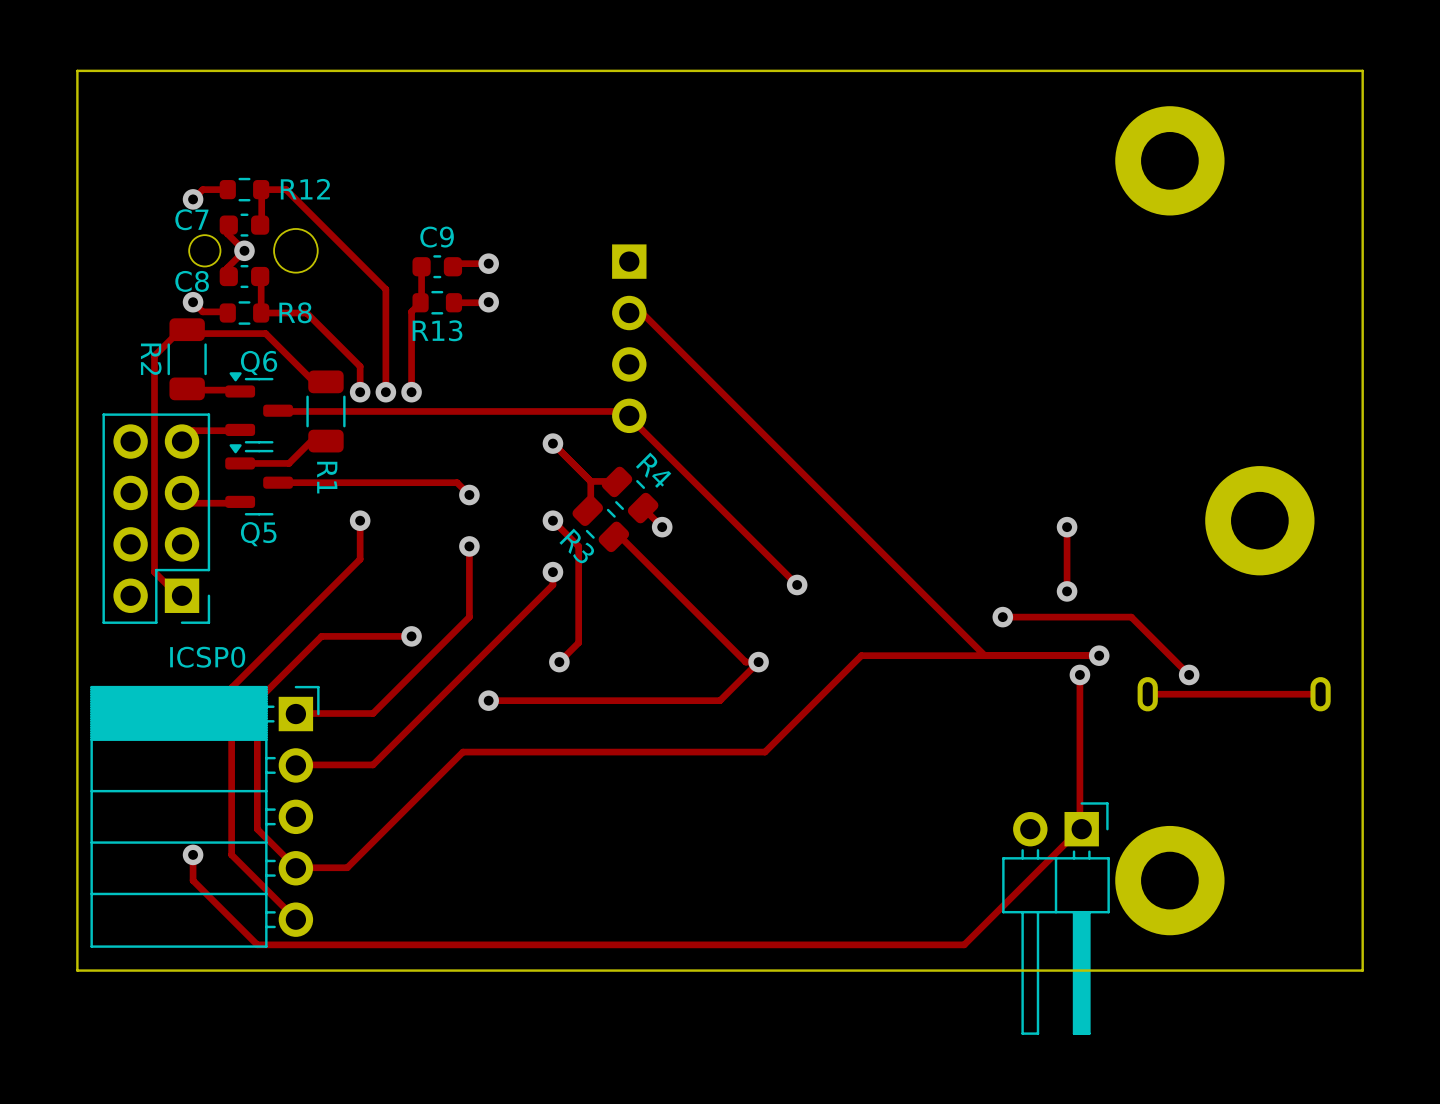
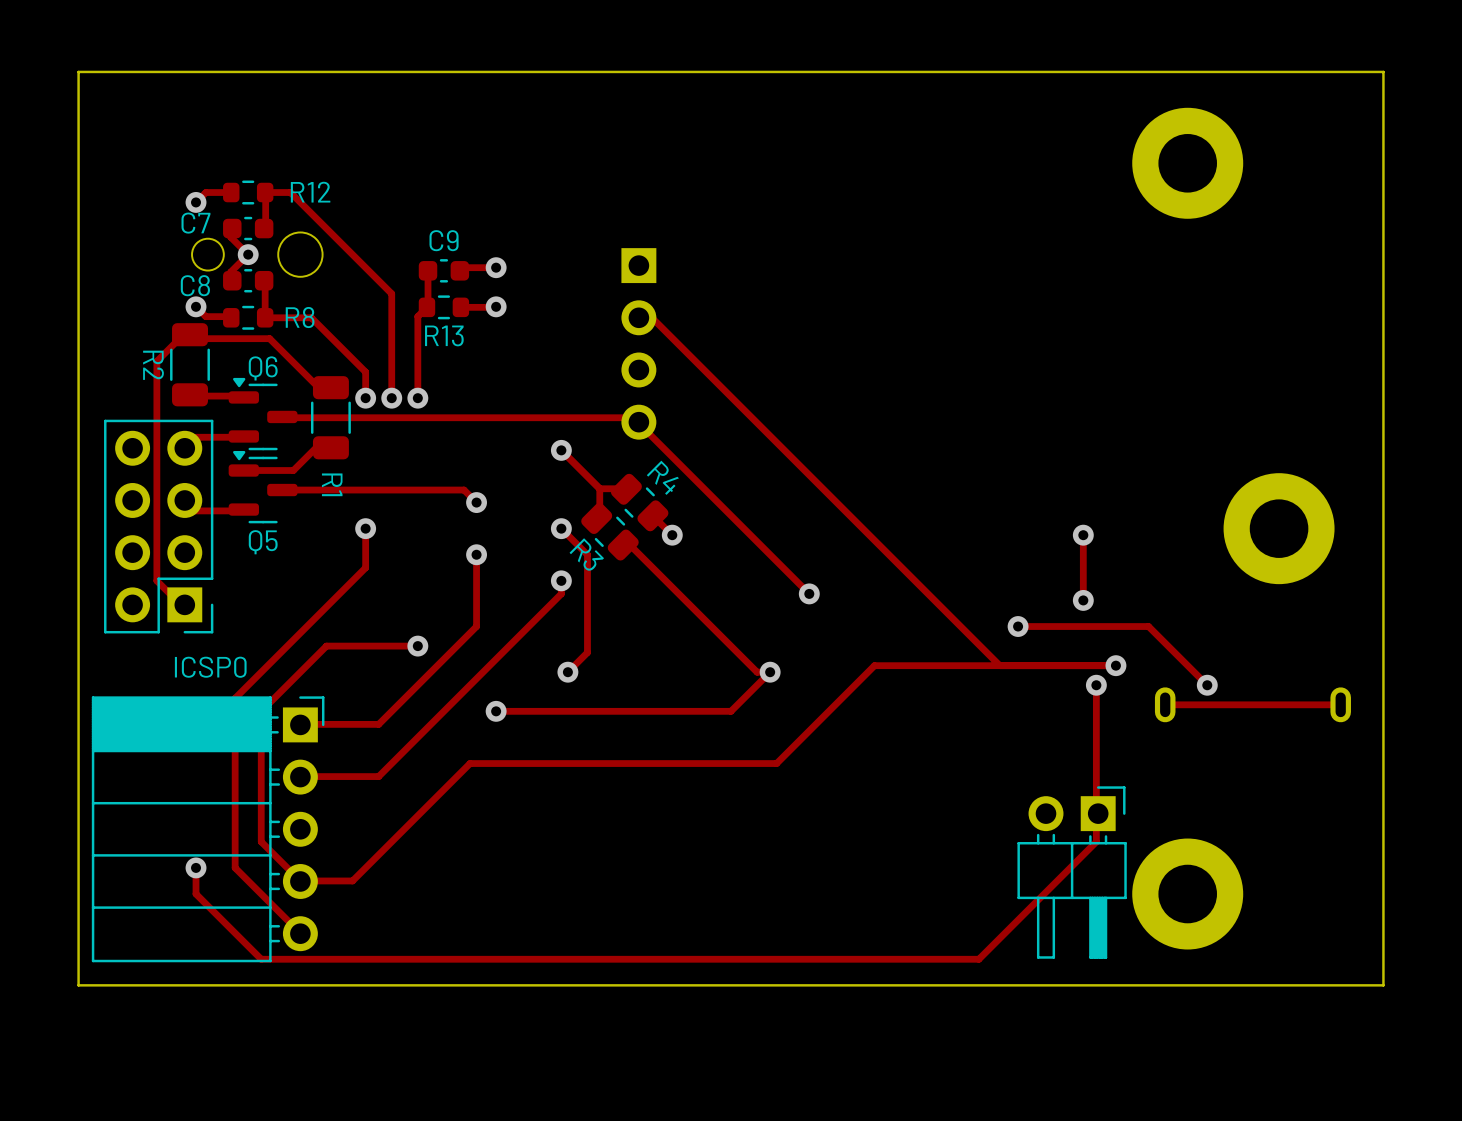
part: none -> (1072, 872)
part: (1056, 918) -> none

